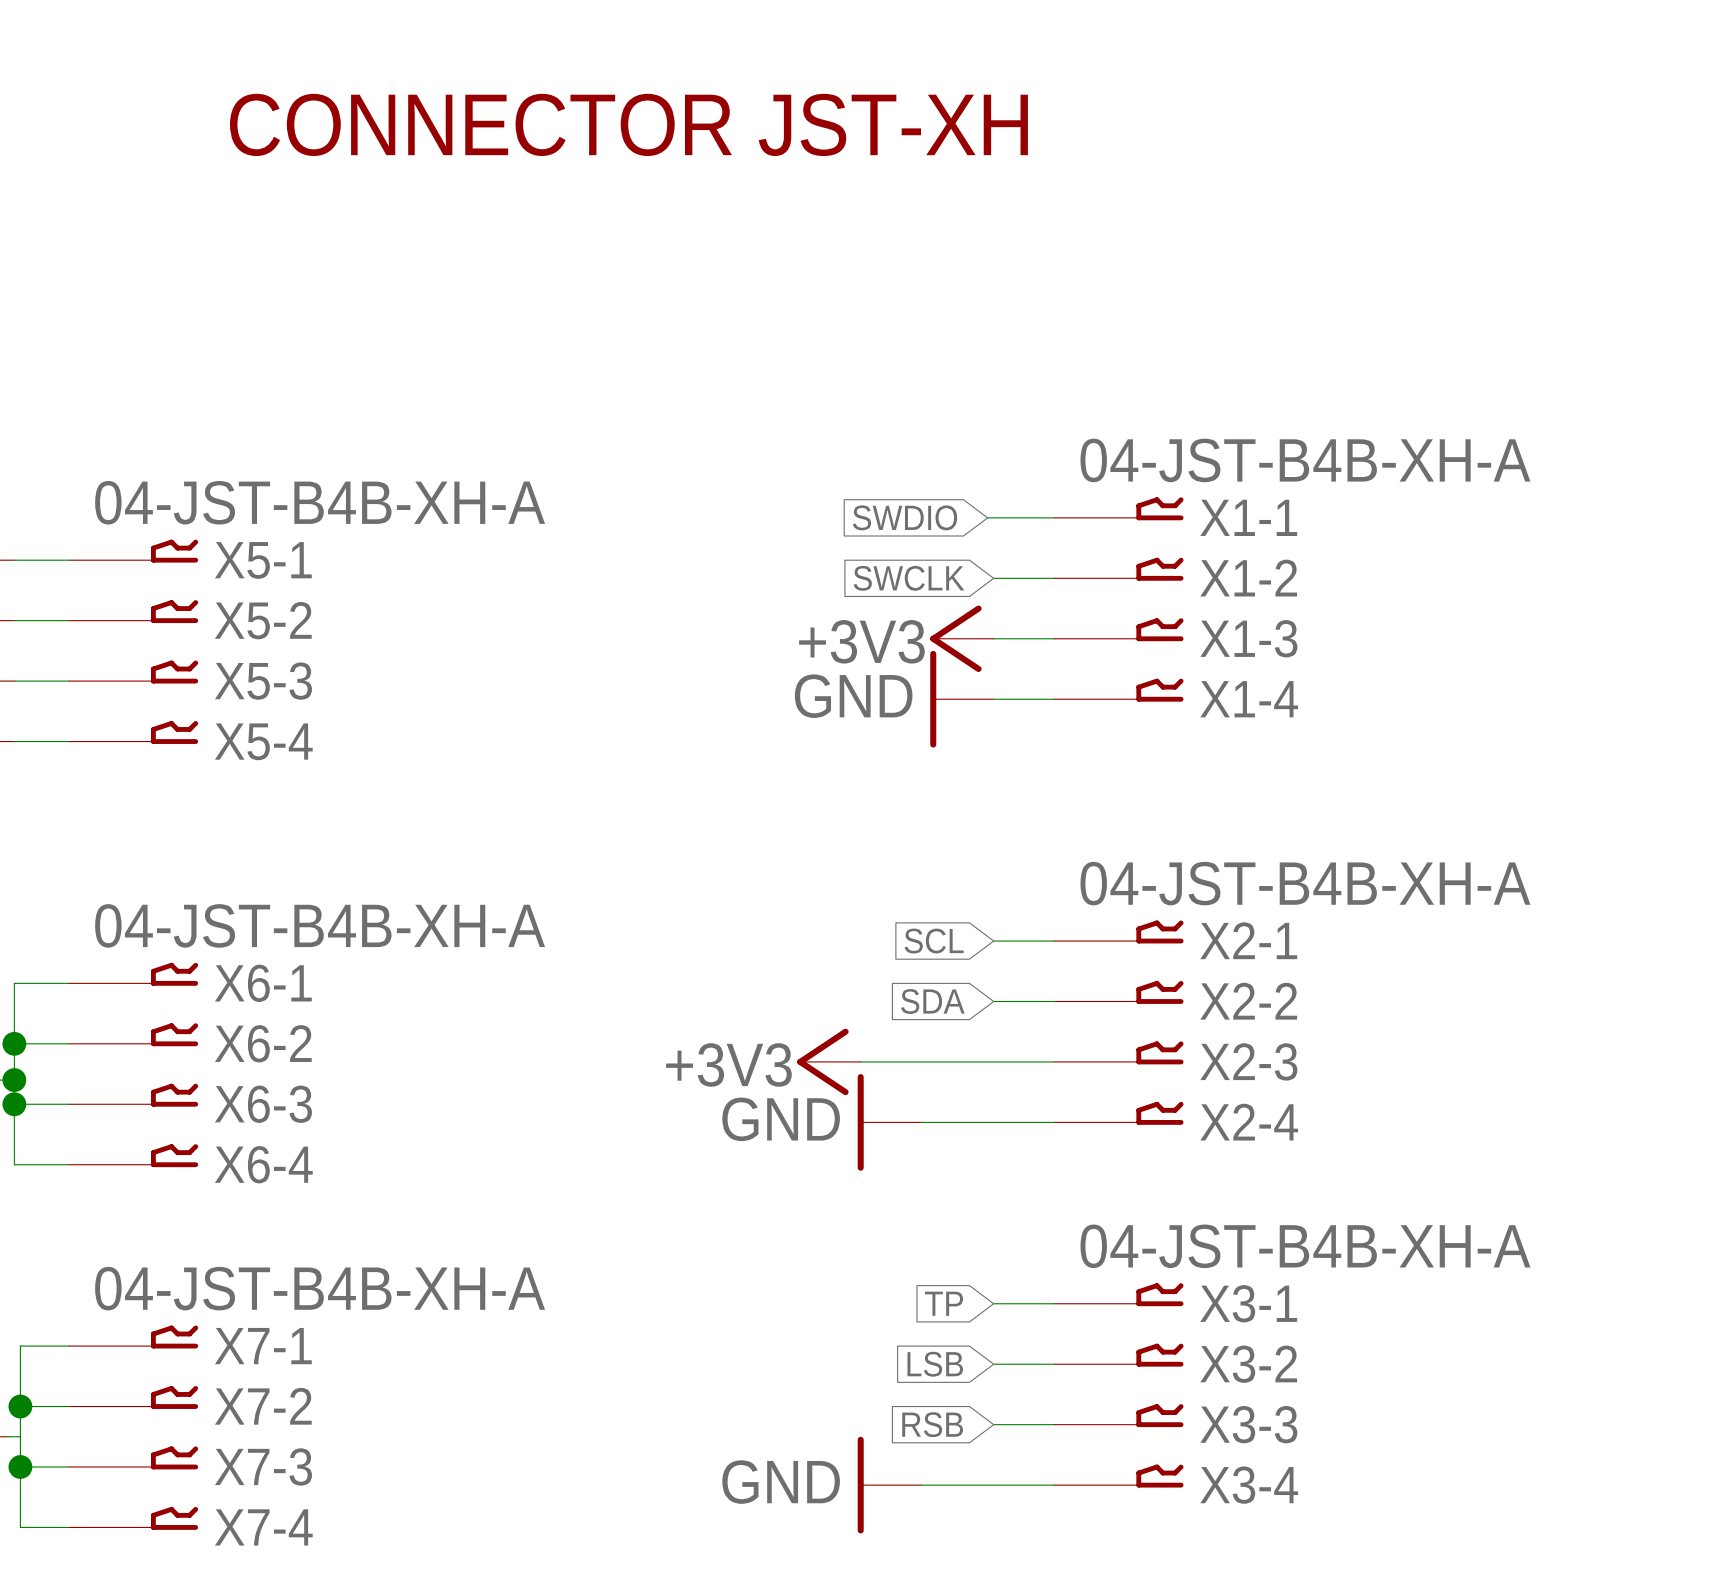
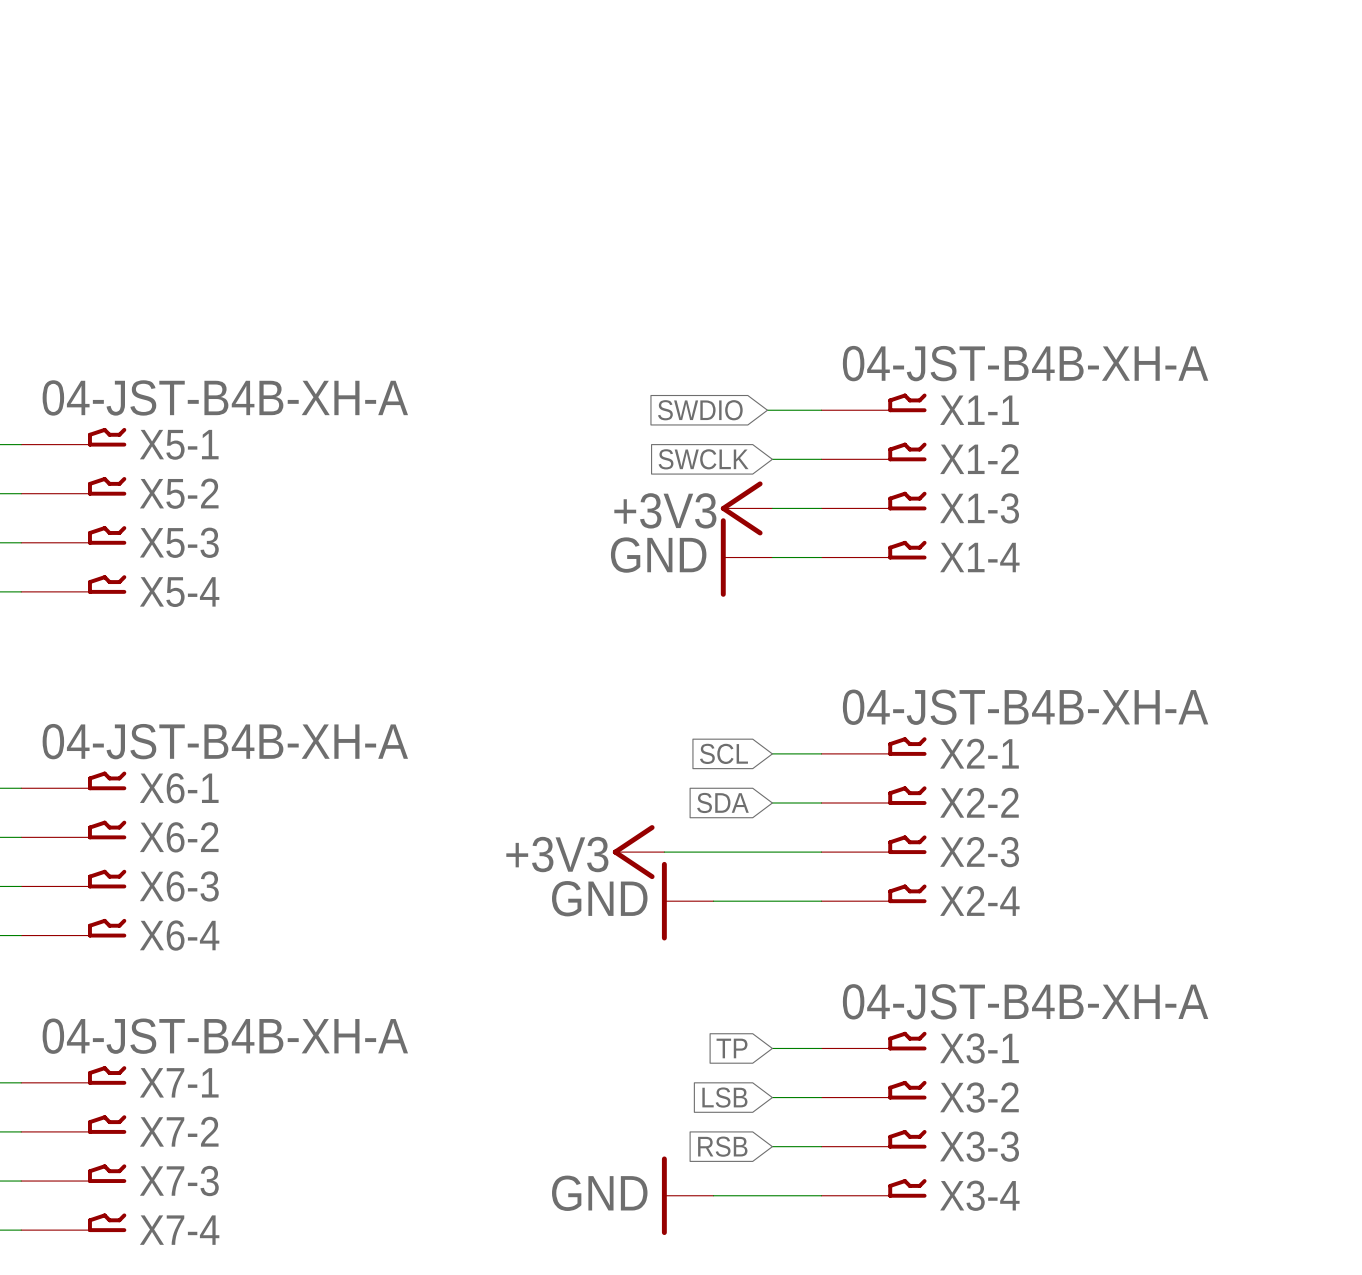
text: CONNECTOR JST-XH (628, 124) -> none

